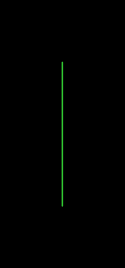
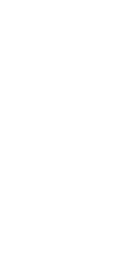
wire: (62, 62) (62, 205) -> none

